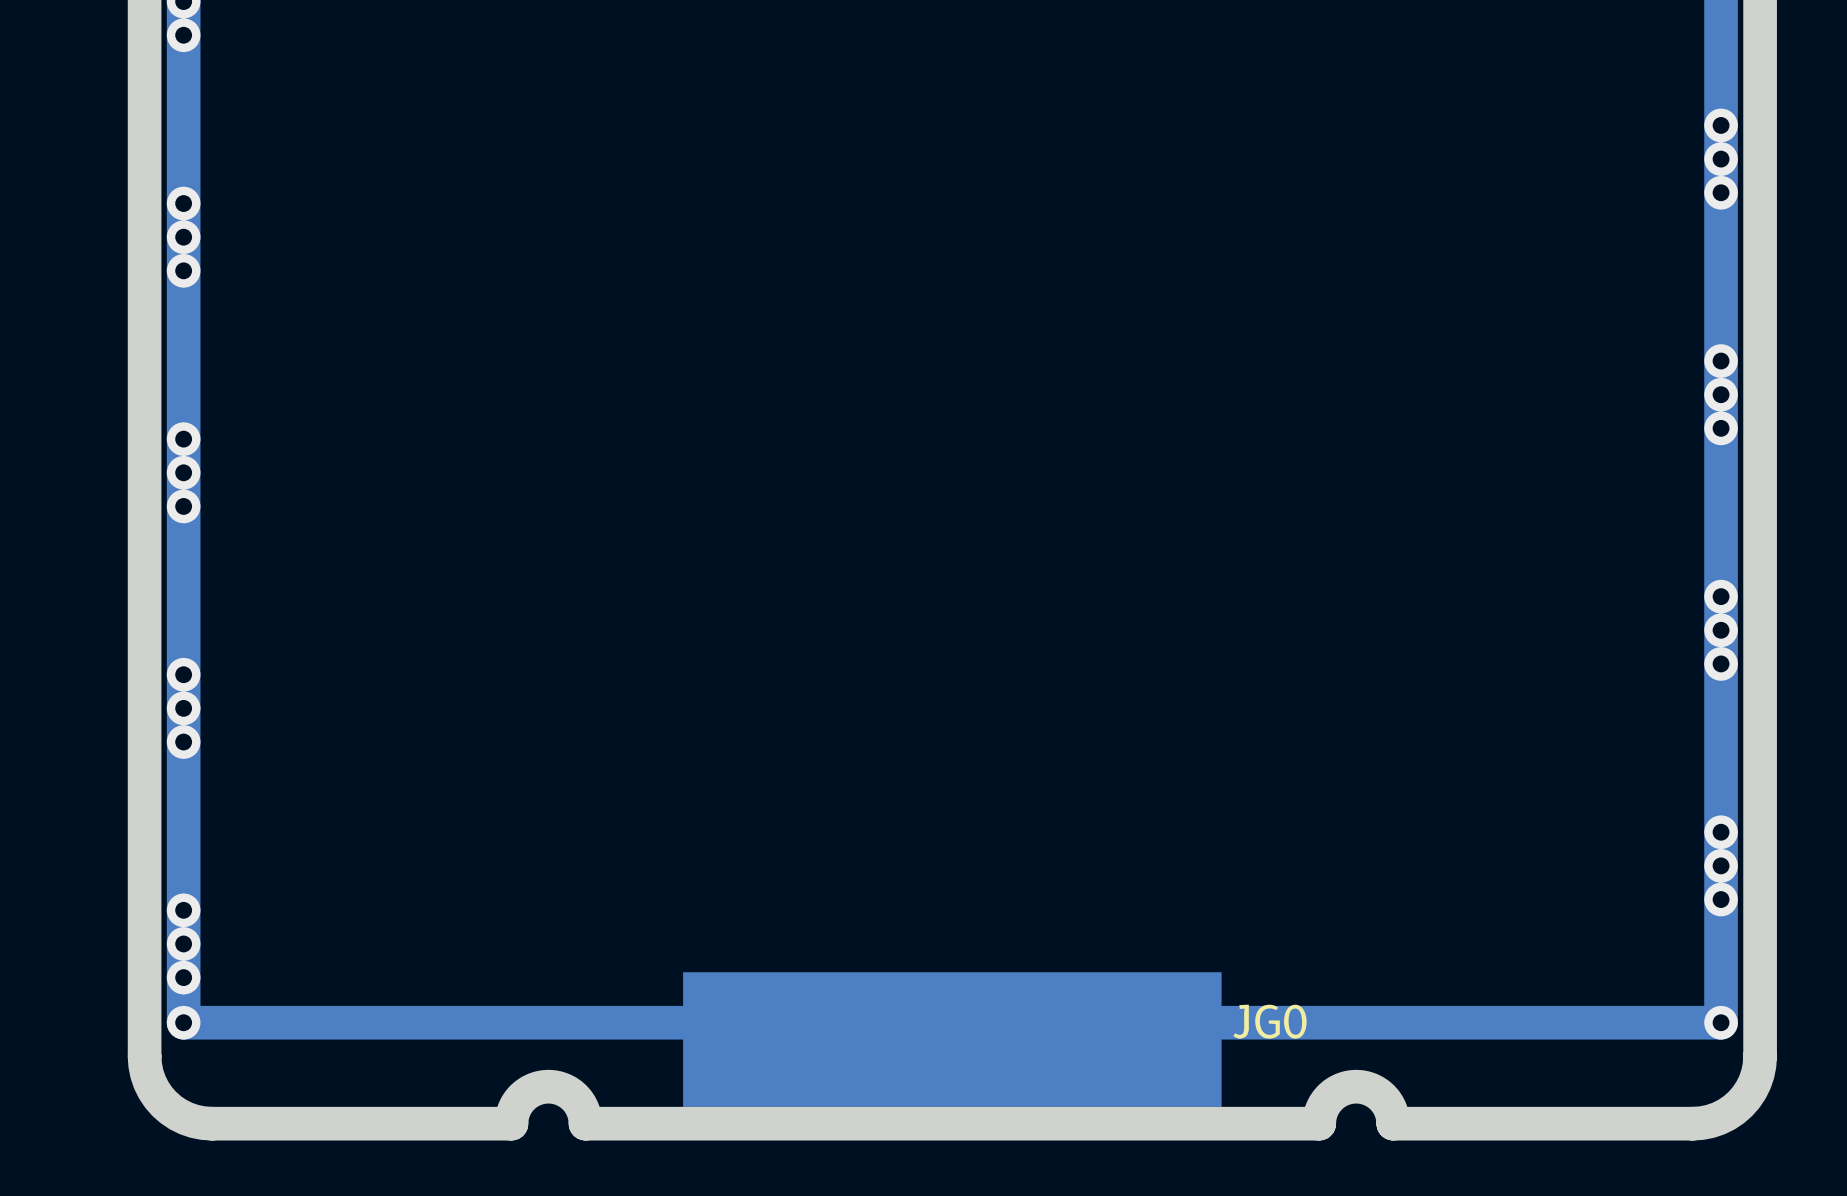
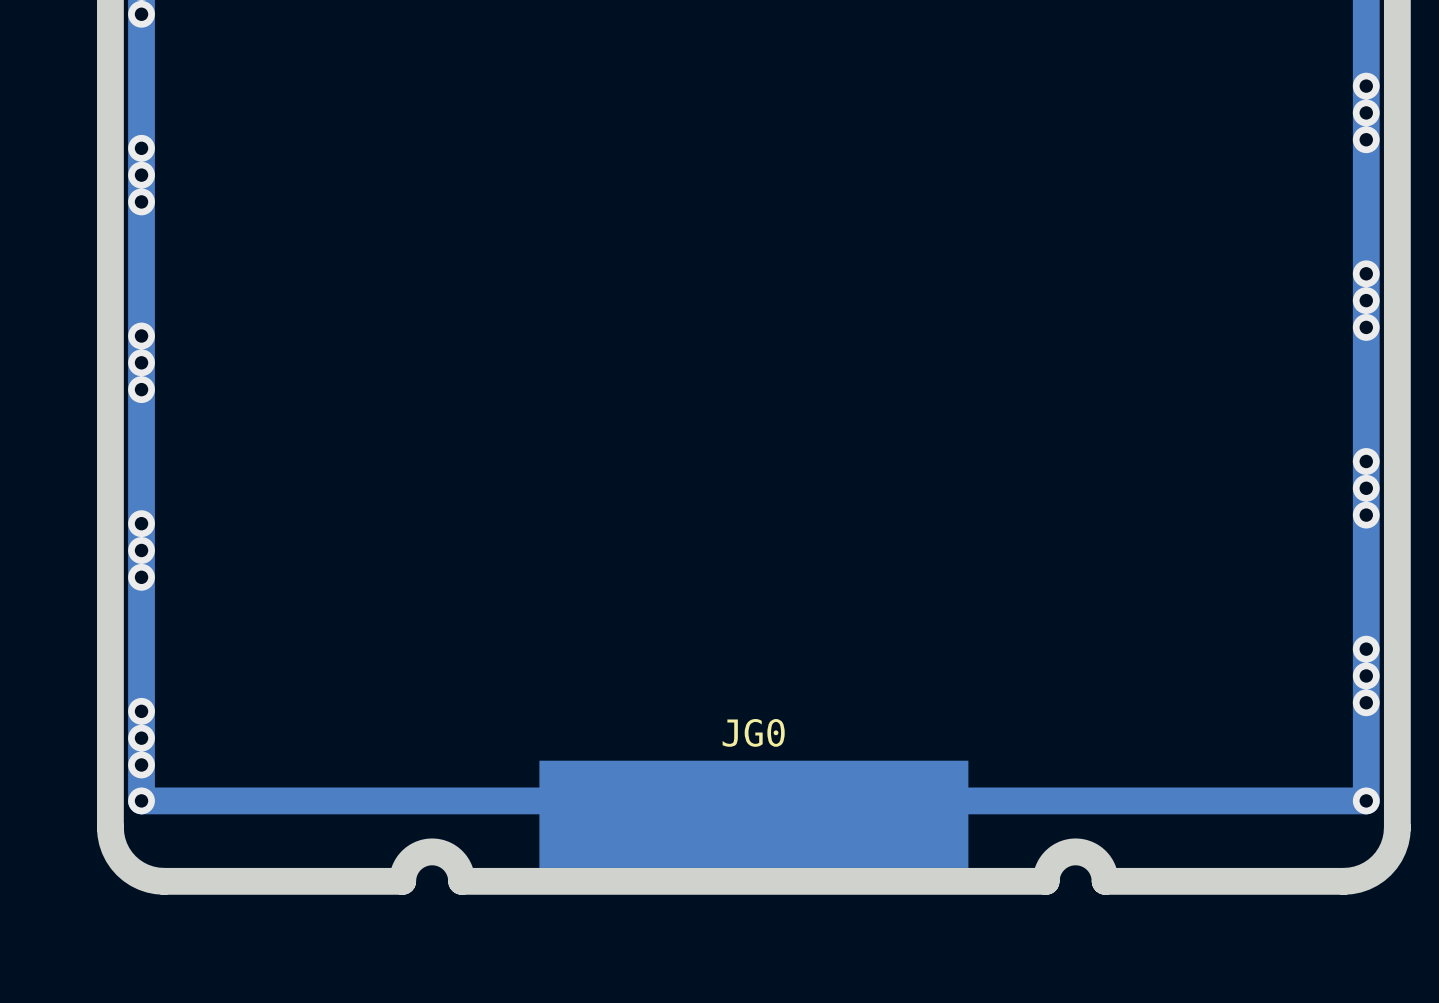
JG0 name position: JG0 (1269, 1021) -> JG0 (753, 732)

